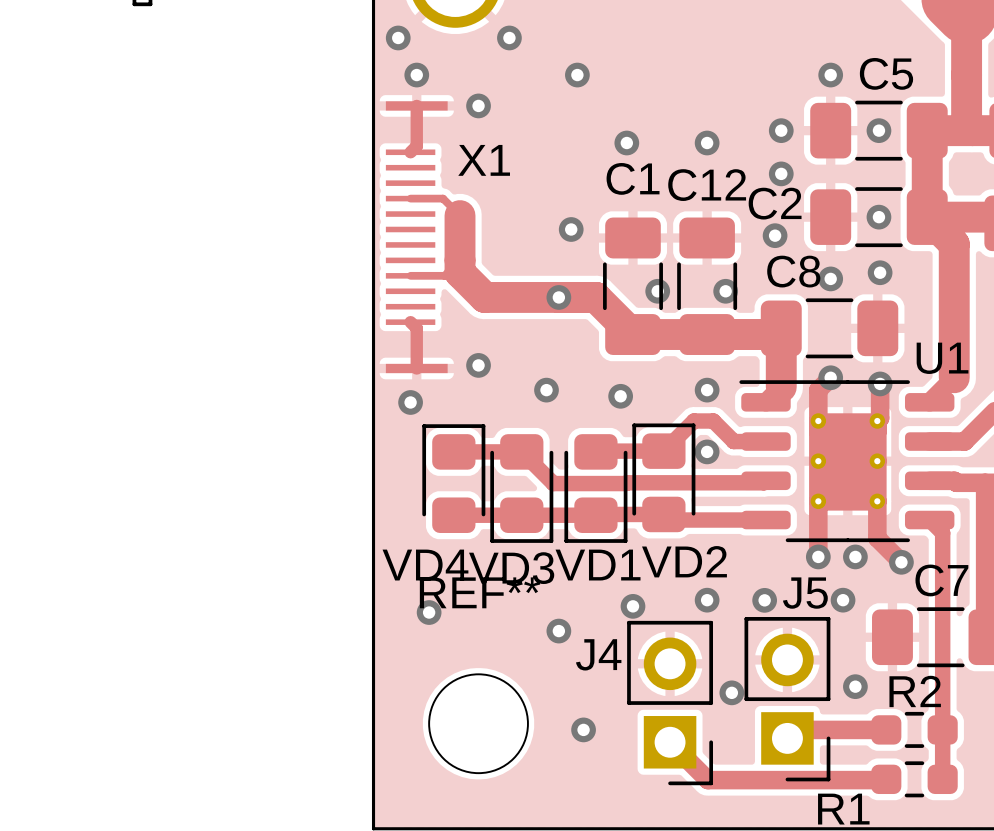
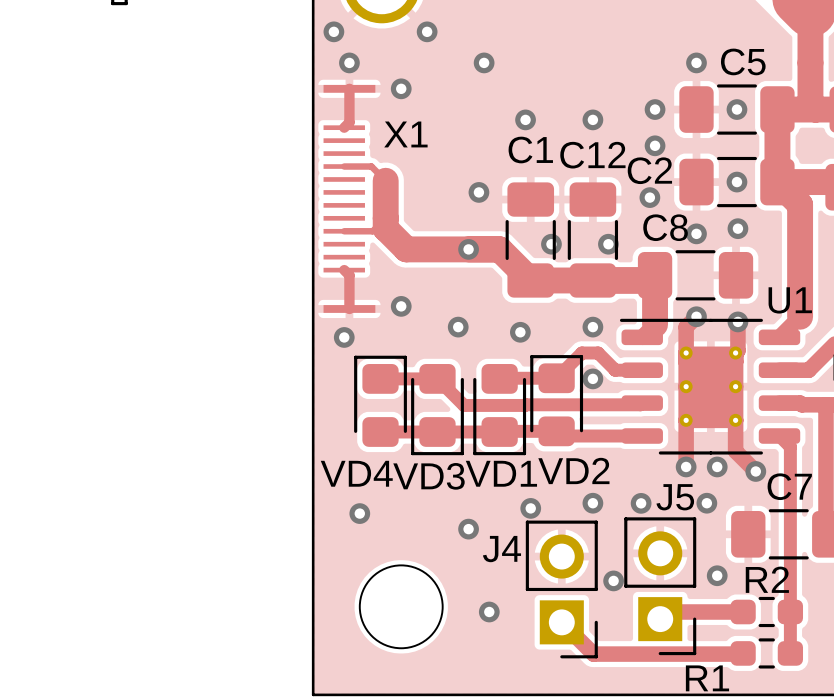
REF** name: REF** (480, 592) -> none

